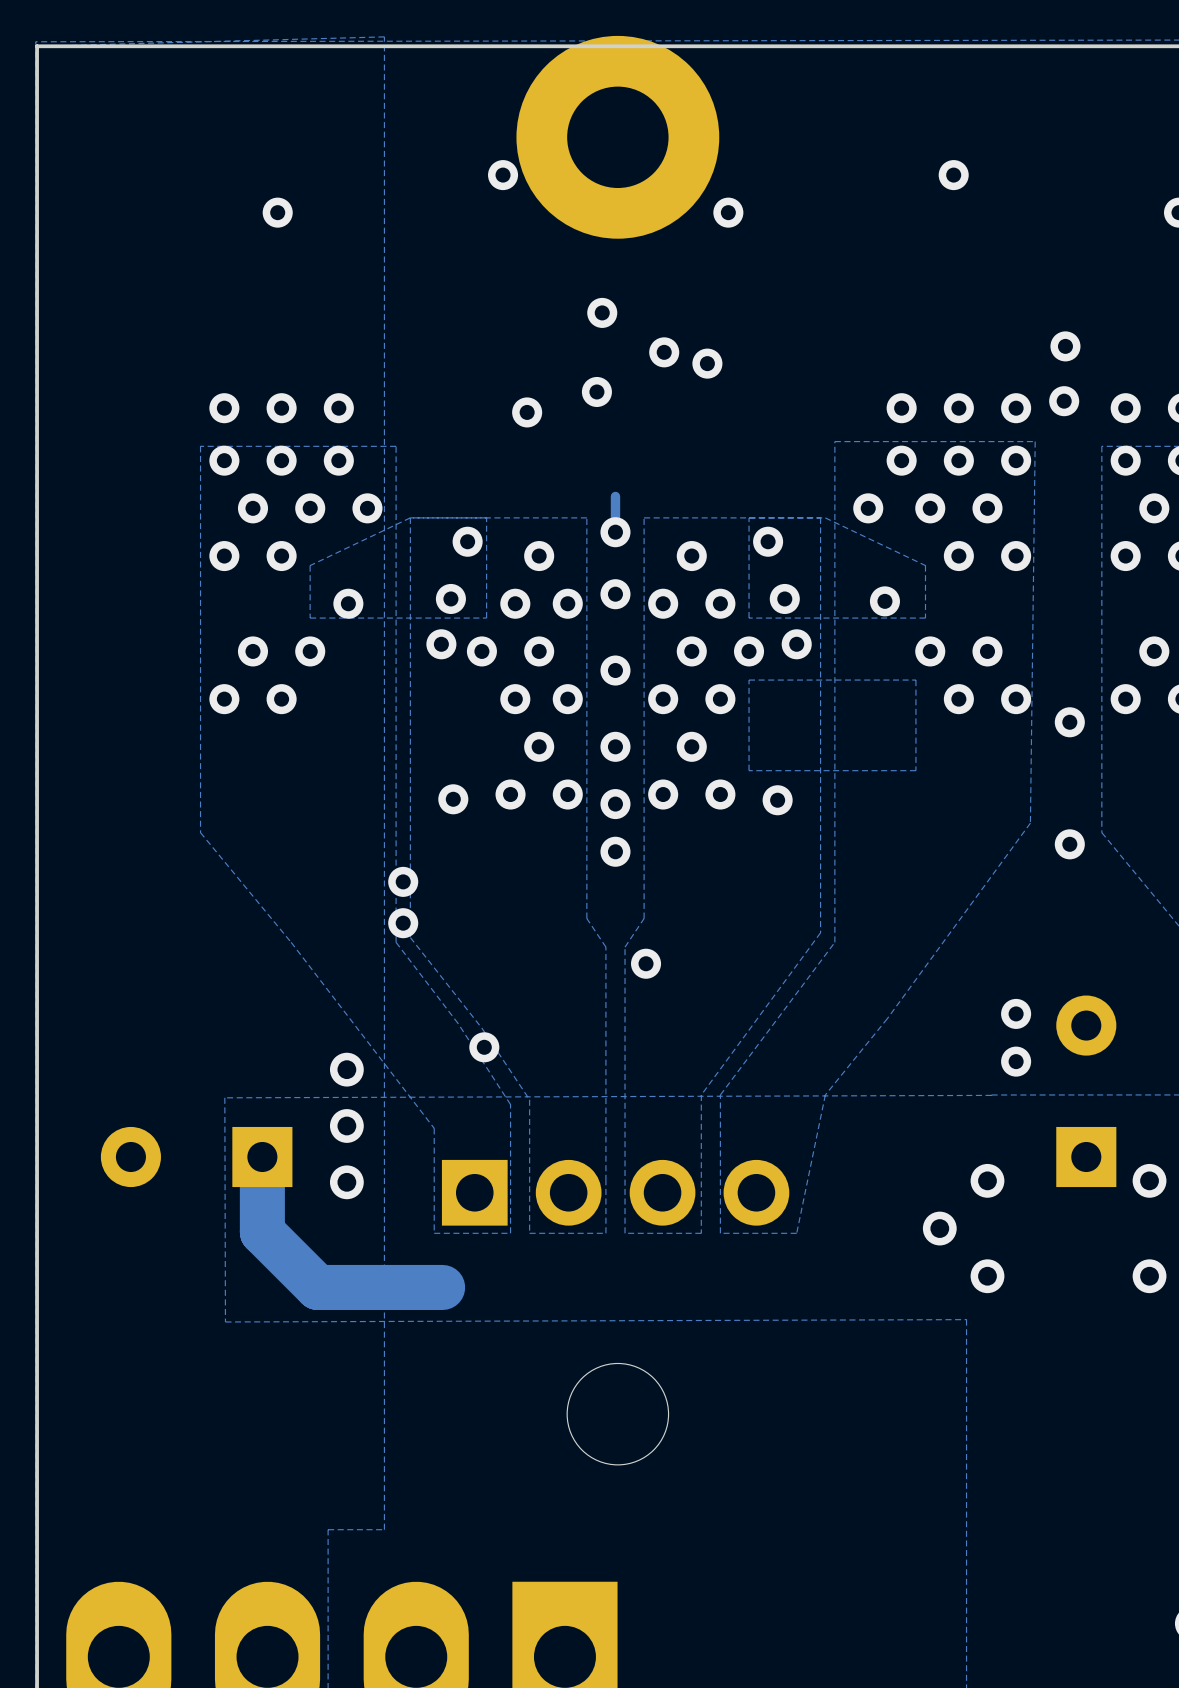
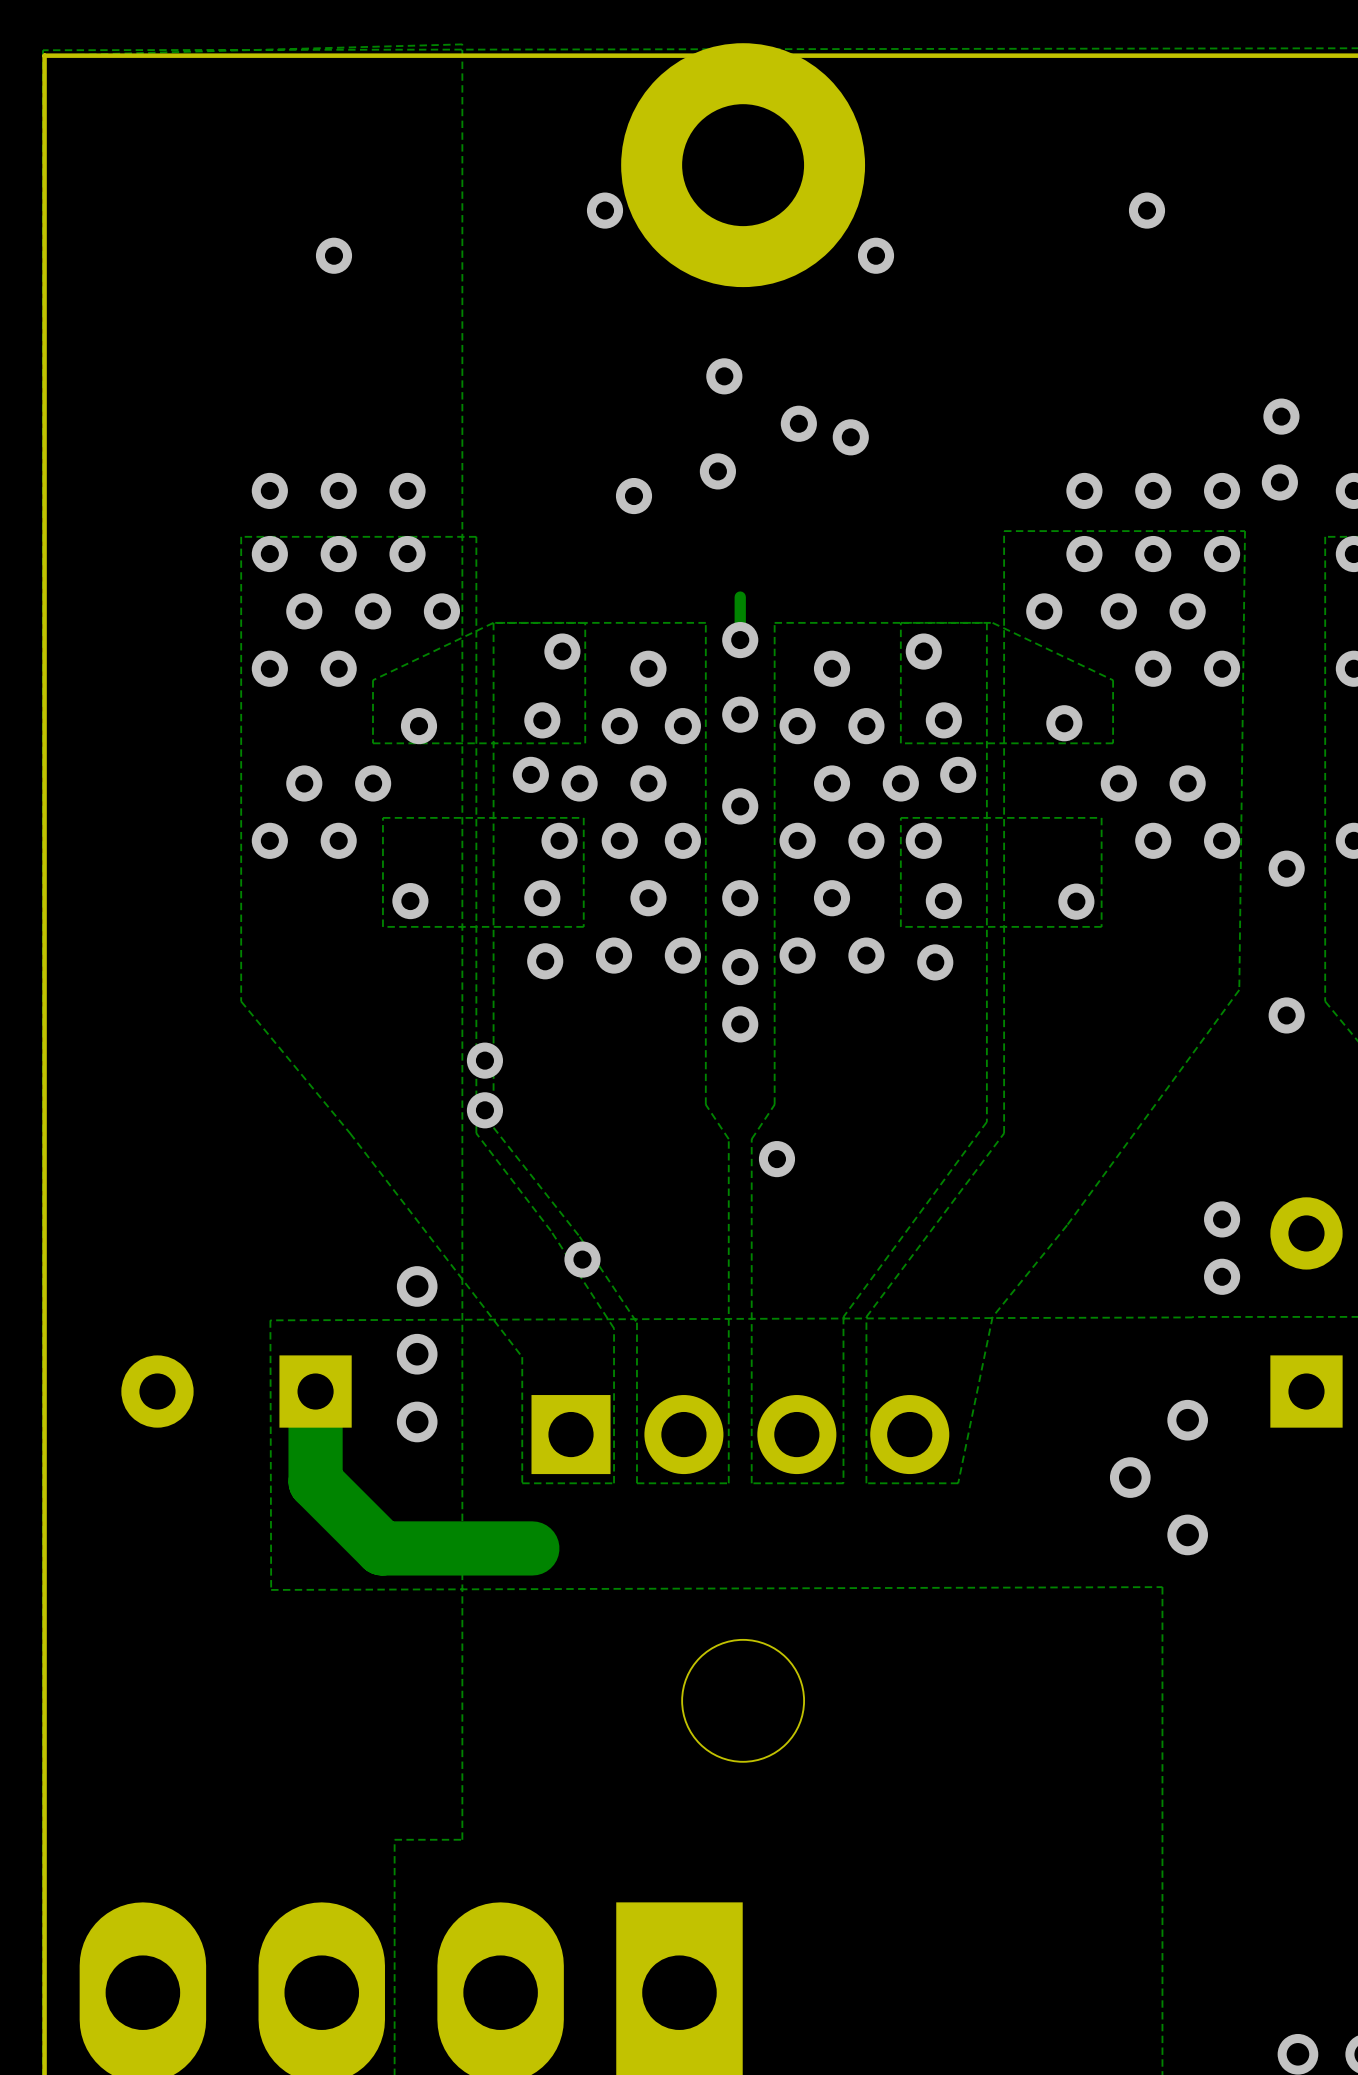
zone outline: none -> (583, 817) (382, 817) (382, 926) (583, 926) (583, 817)
via: none -> (559, 840)
via: none -> (923, 840)
via: none -> (542, 898)
via: none -> (410, 901)
via: none -> (943, 901)
via: none -> (1076, 901)

